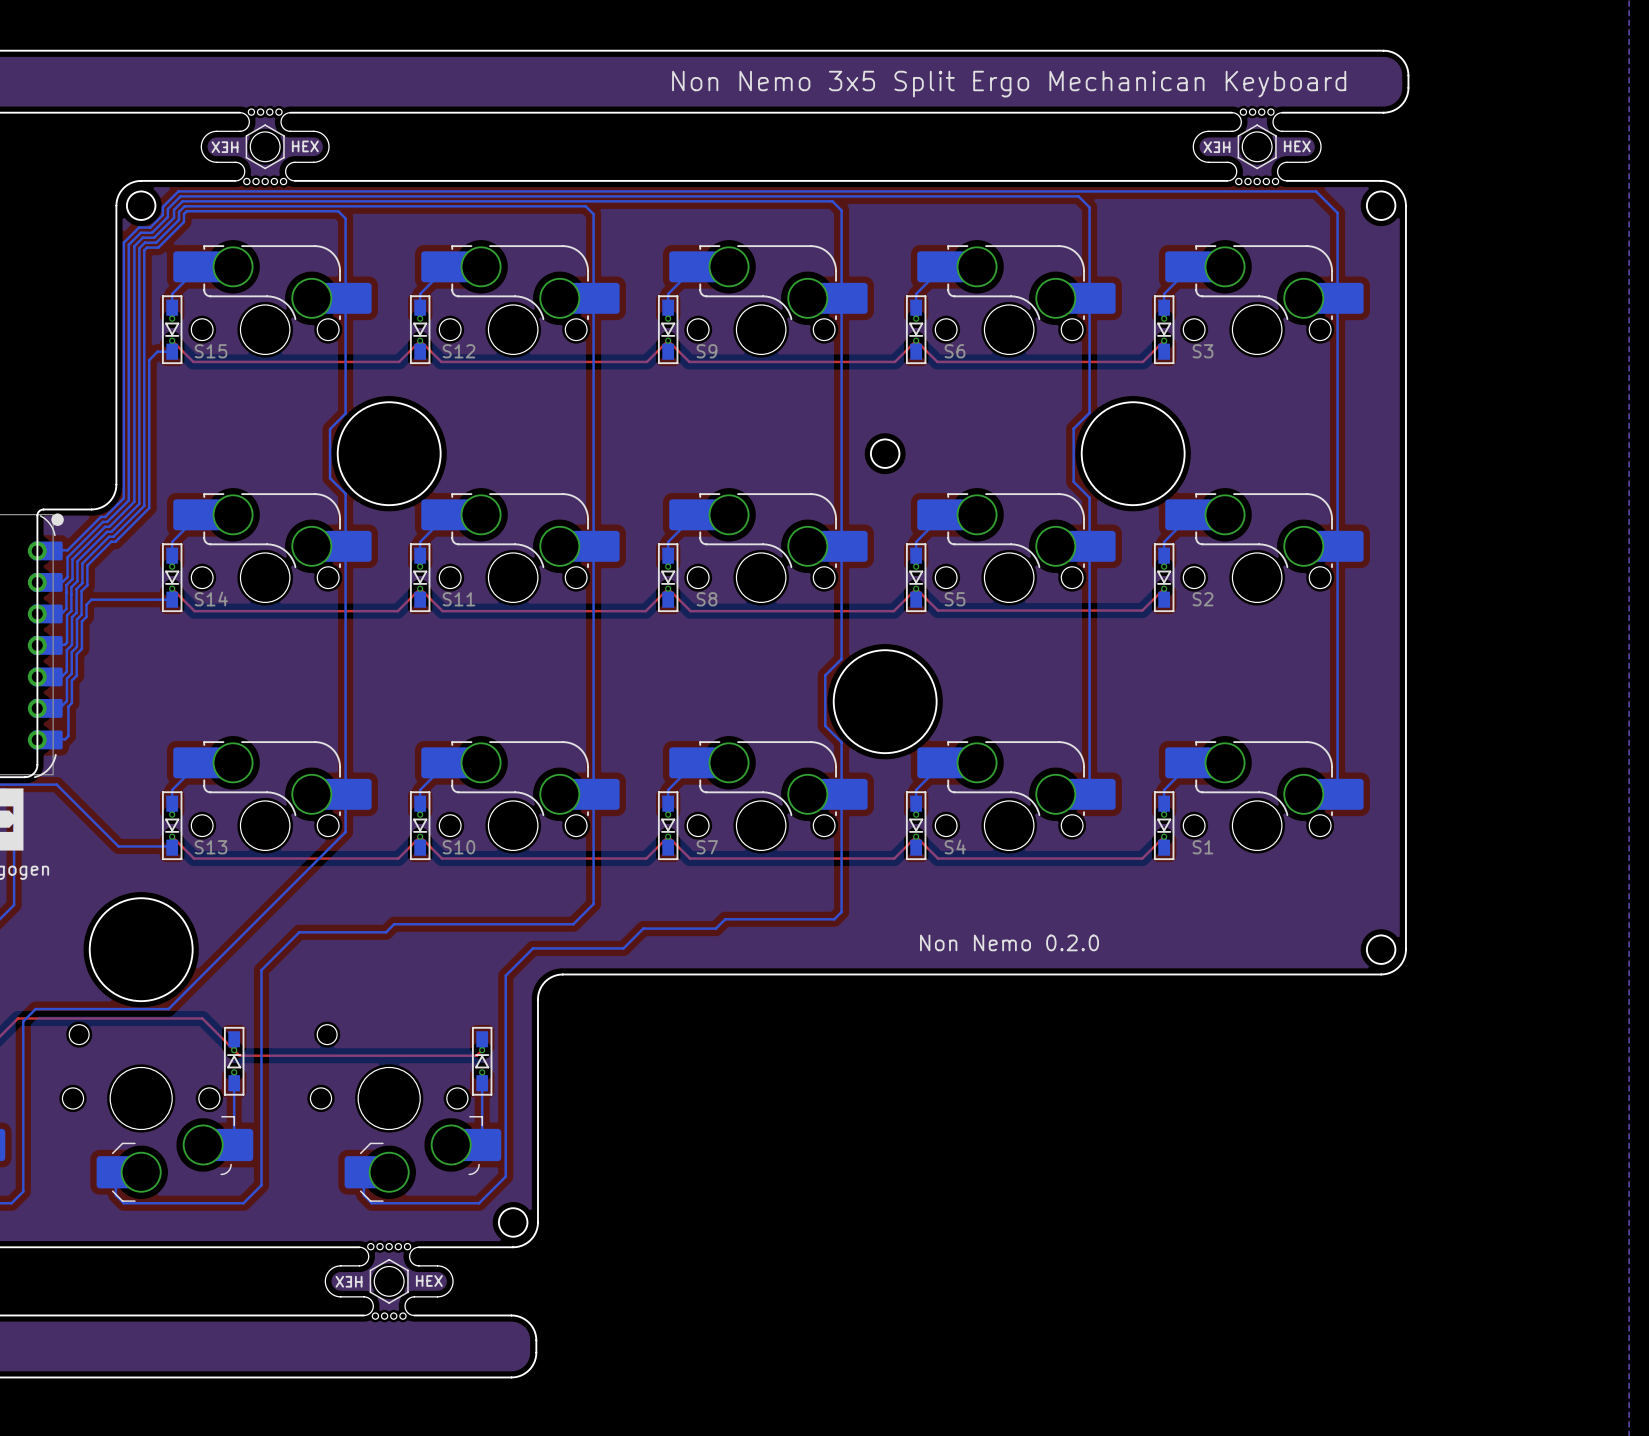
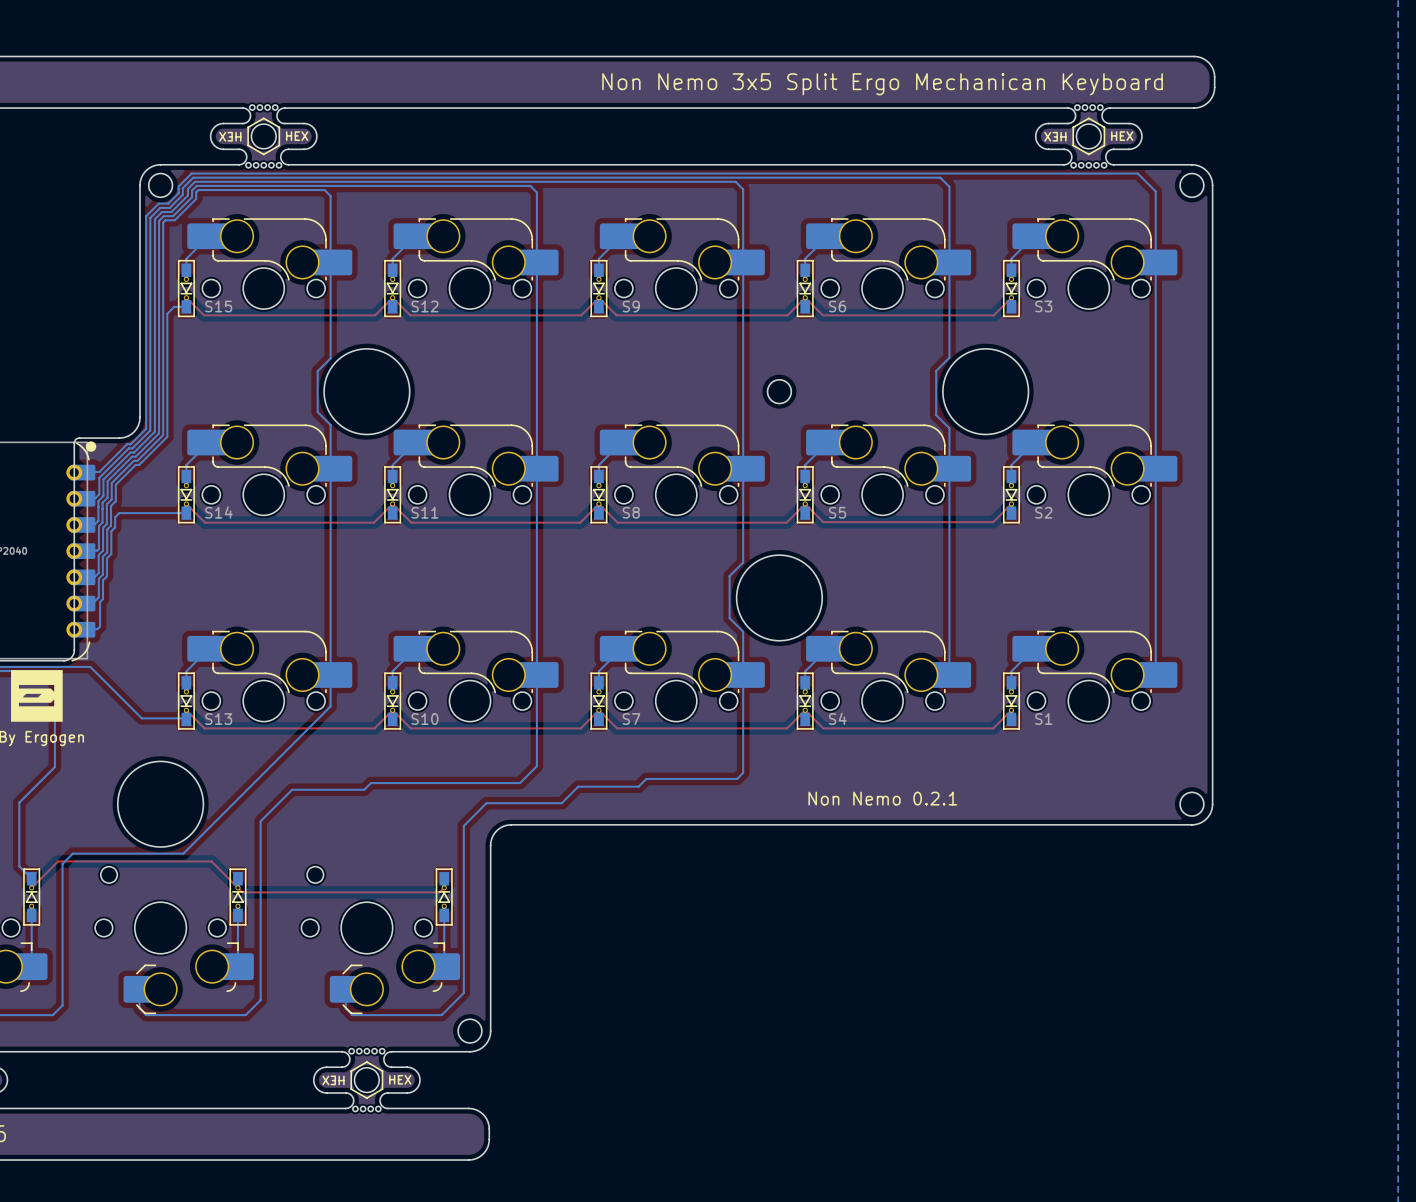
text: Non Nemo 0.2.0 (1009, 942) -> Non Nemo 0.2.1 (882, 798)

